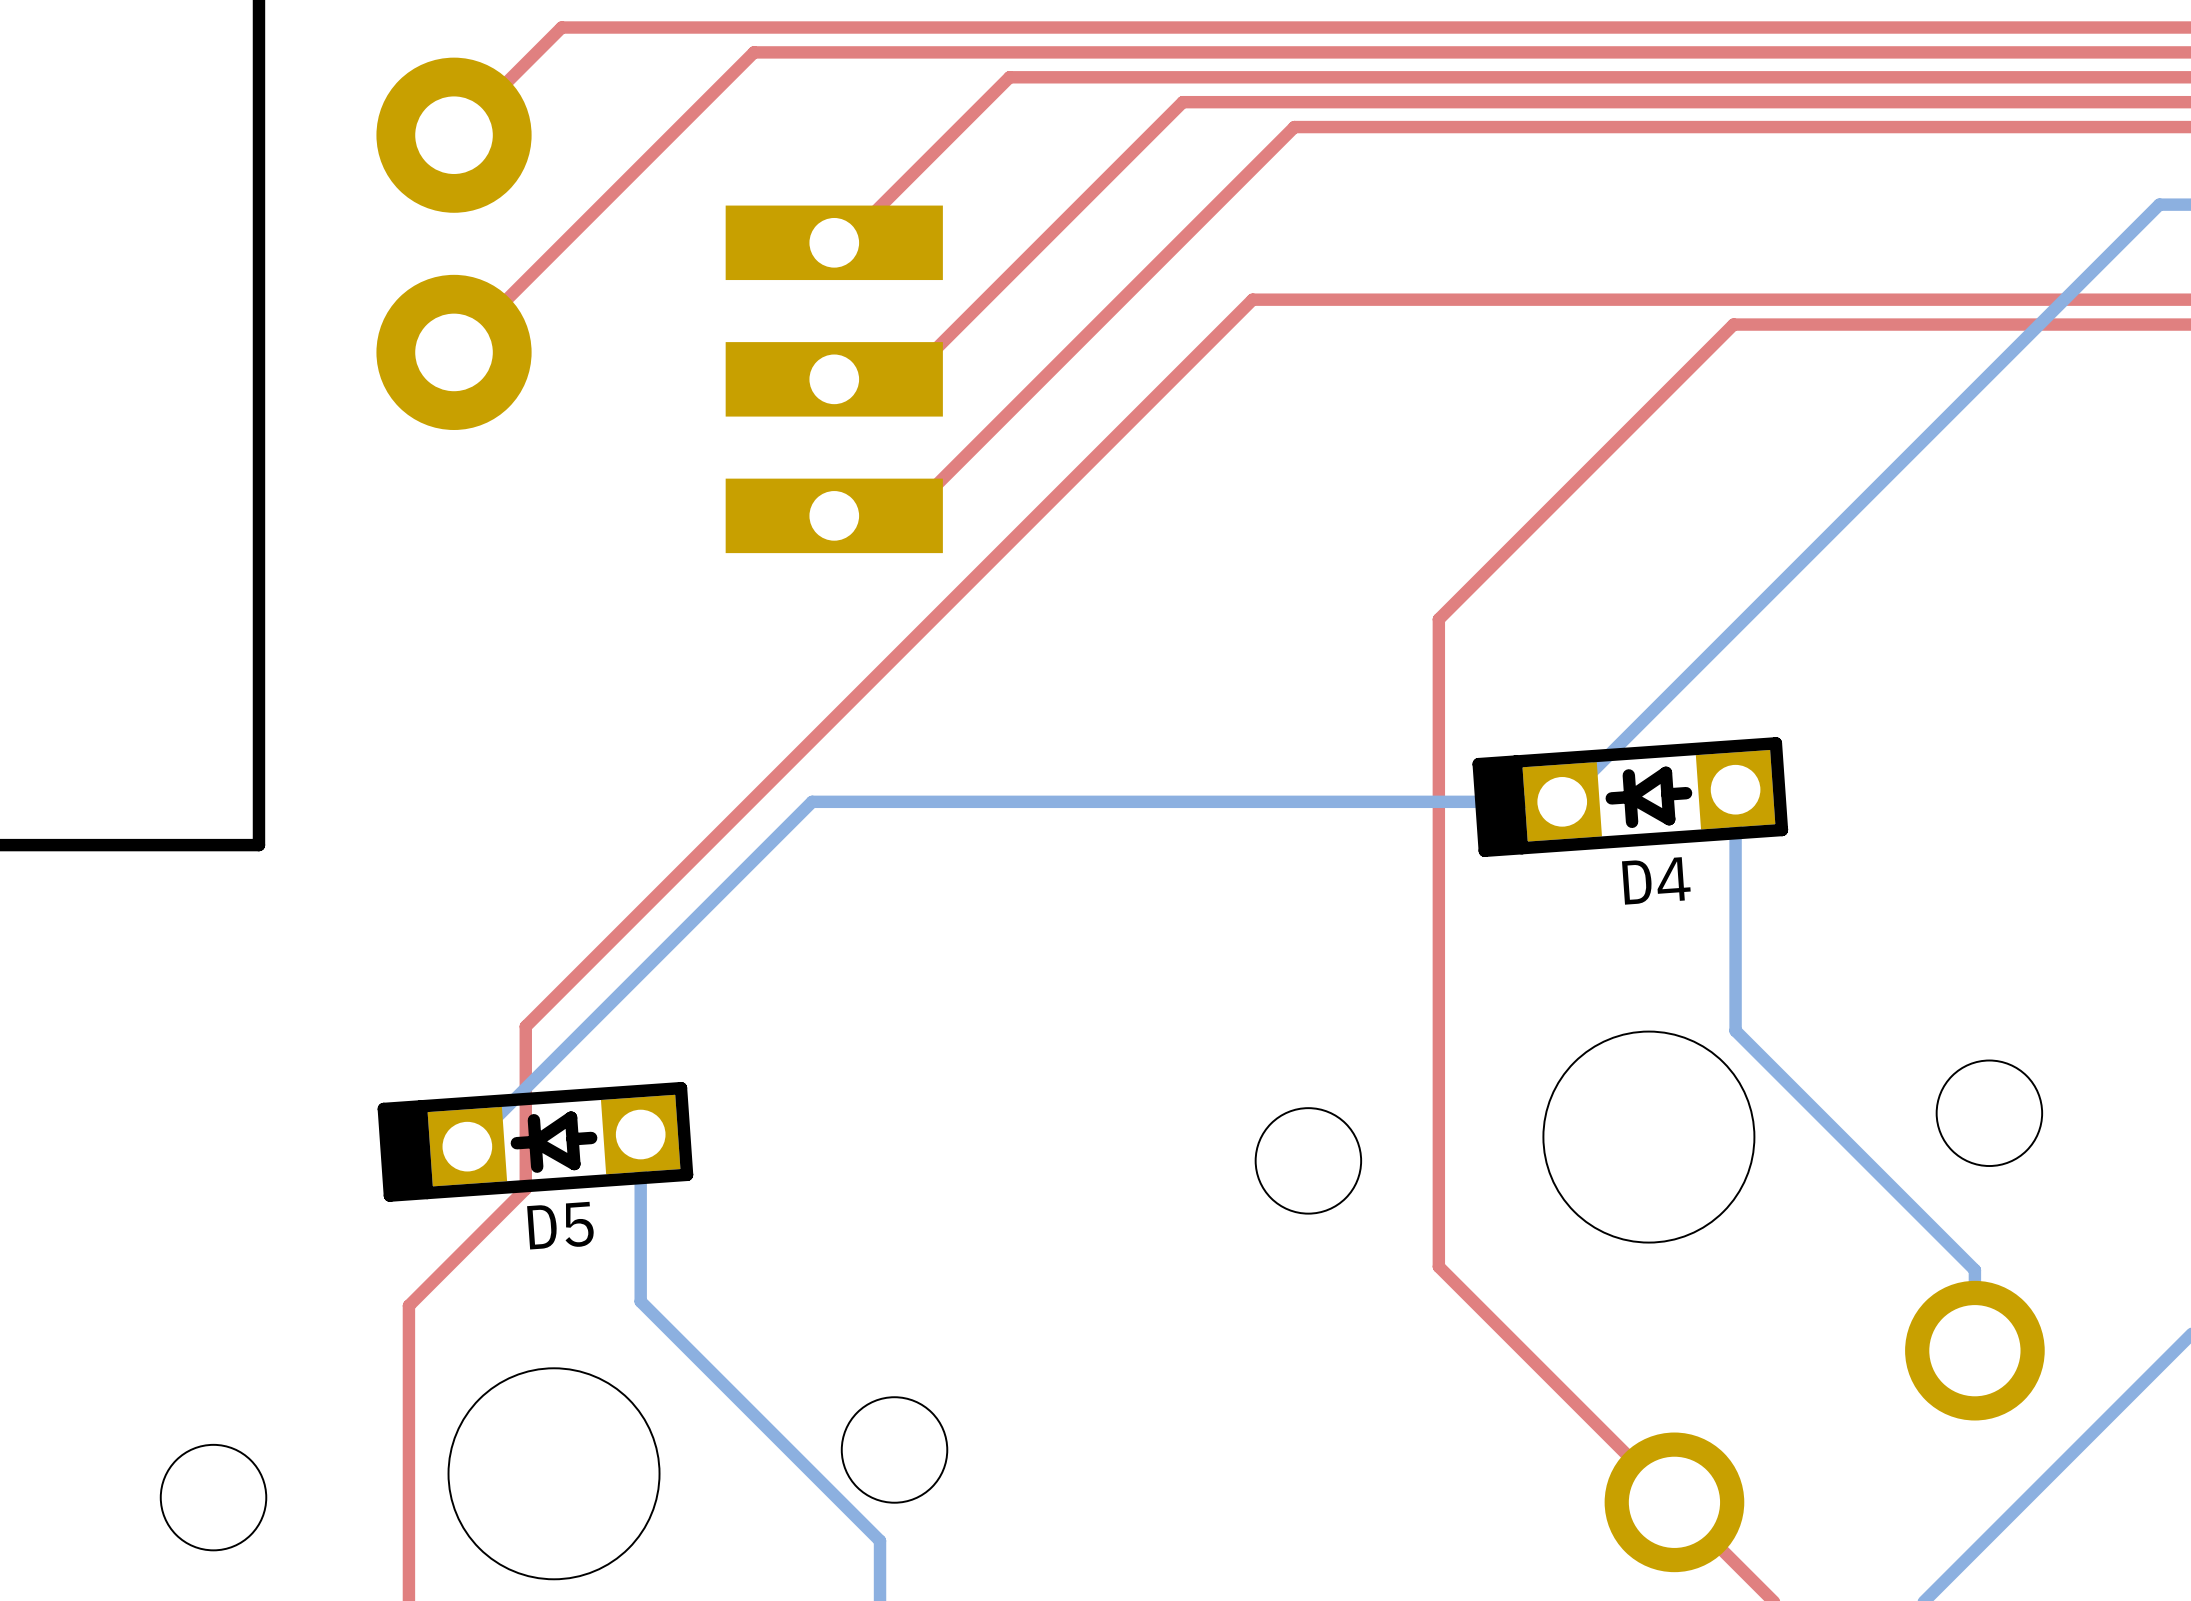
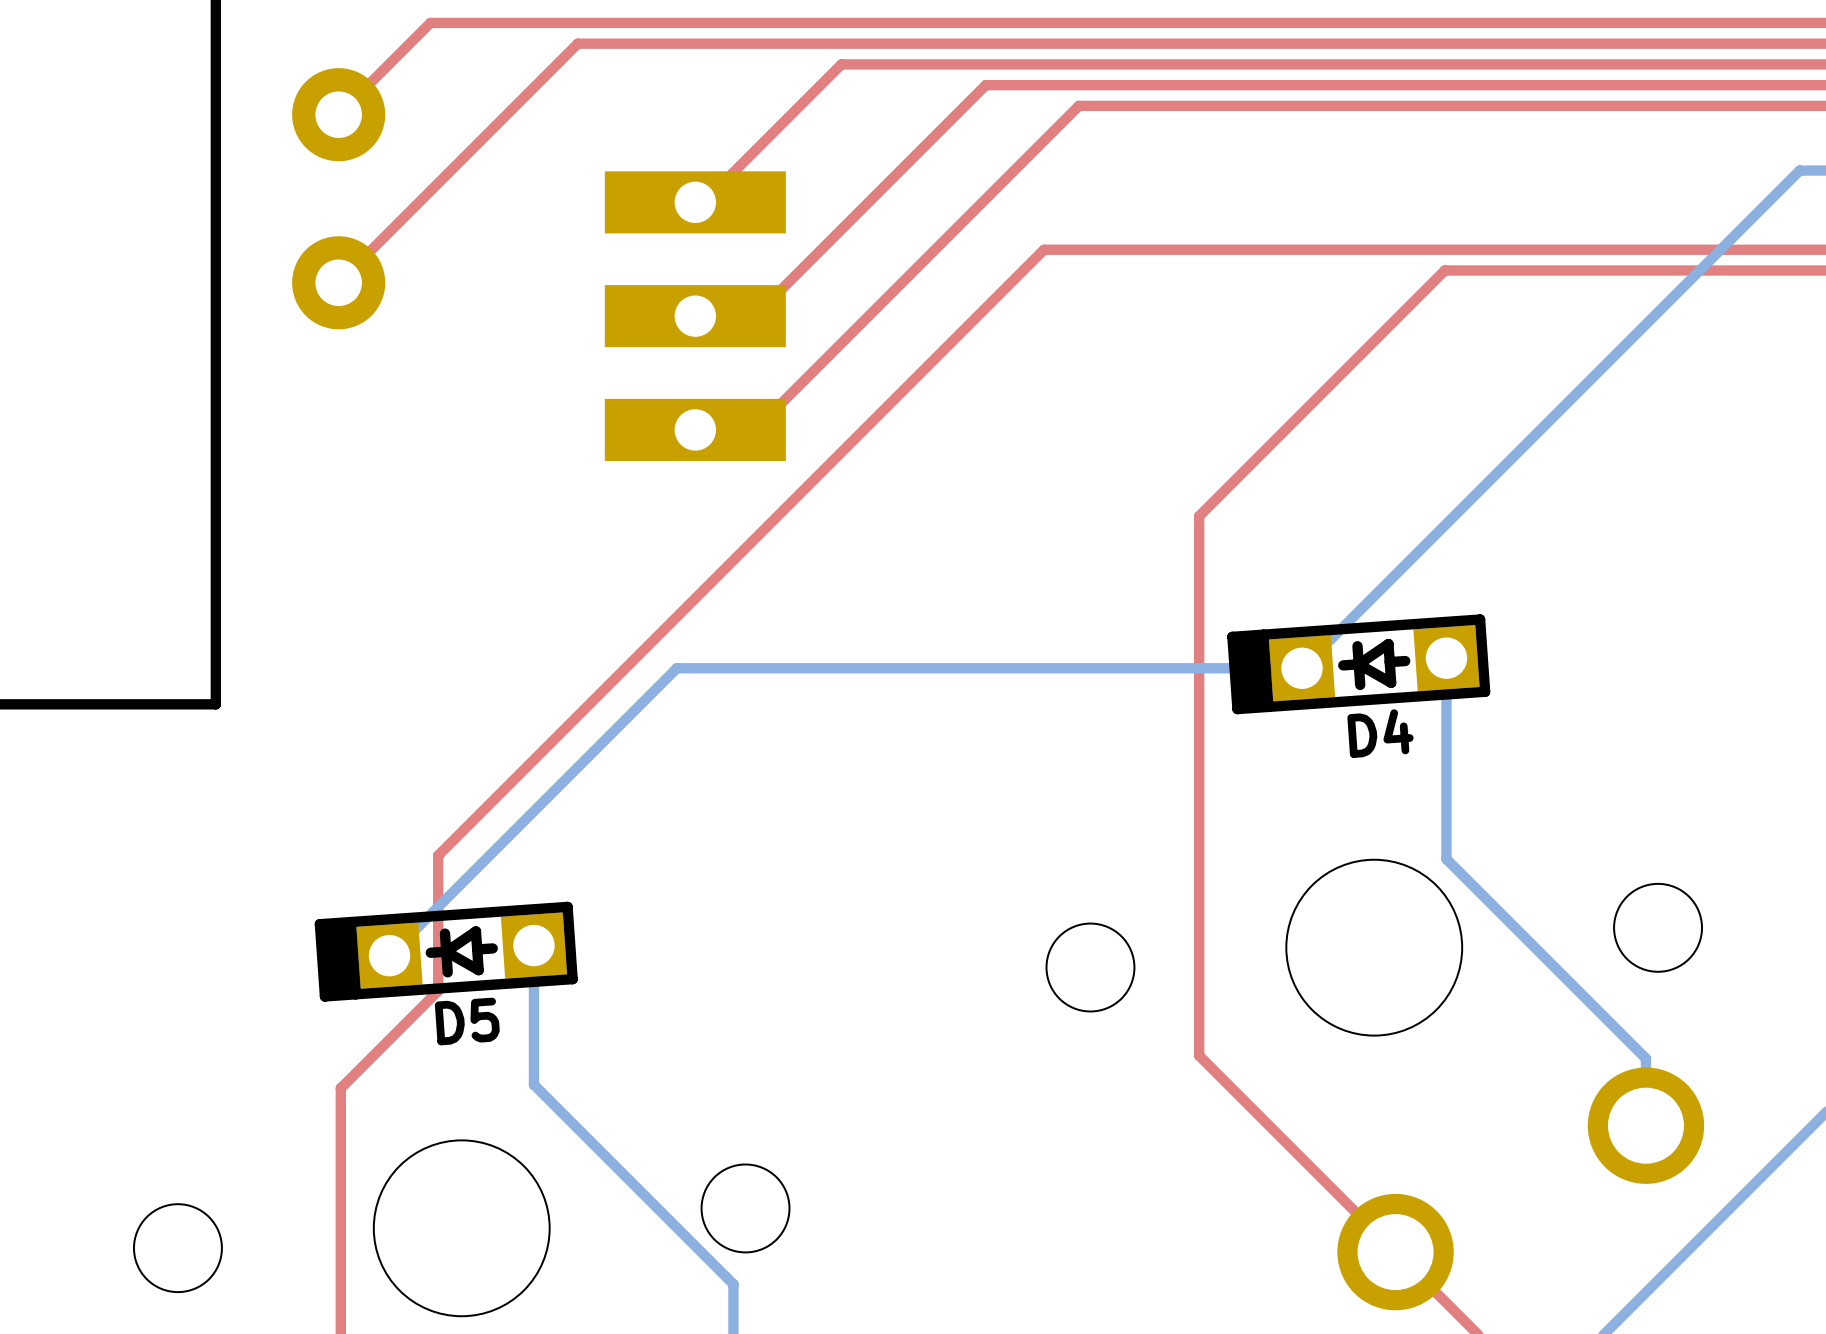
top track: (561, 27) (454, 135) -> (468, 22) (430, 22) (338, 114)
top track: (754, 52) (454, 352) -> (628, 43) (577, 43) (338, 282)
part footprint: [376, 57, 532, 213] -> [292, 68, 386, 162]
part footprint: [376, 274, 532, 431] -> [292, 236, 386, 330]

